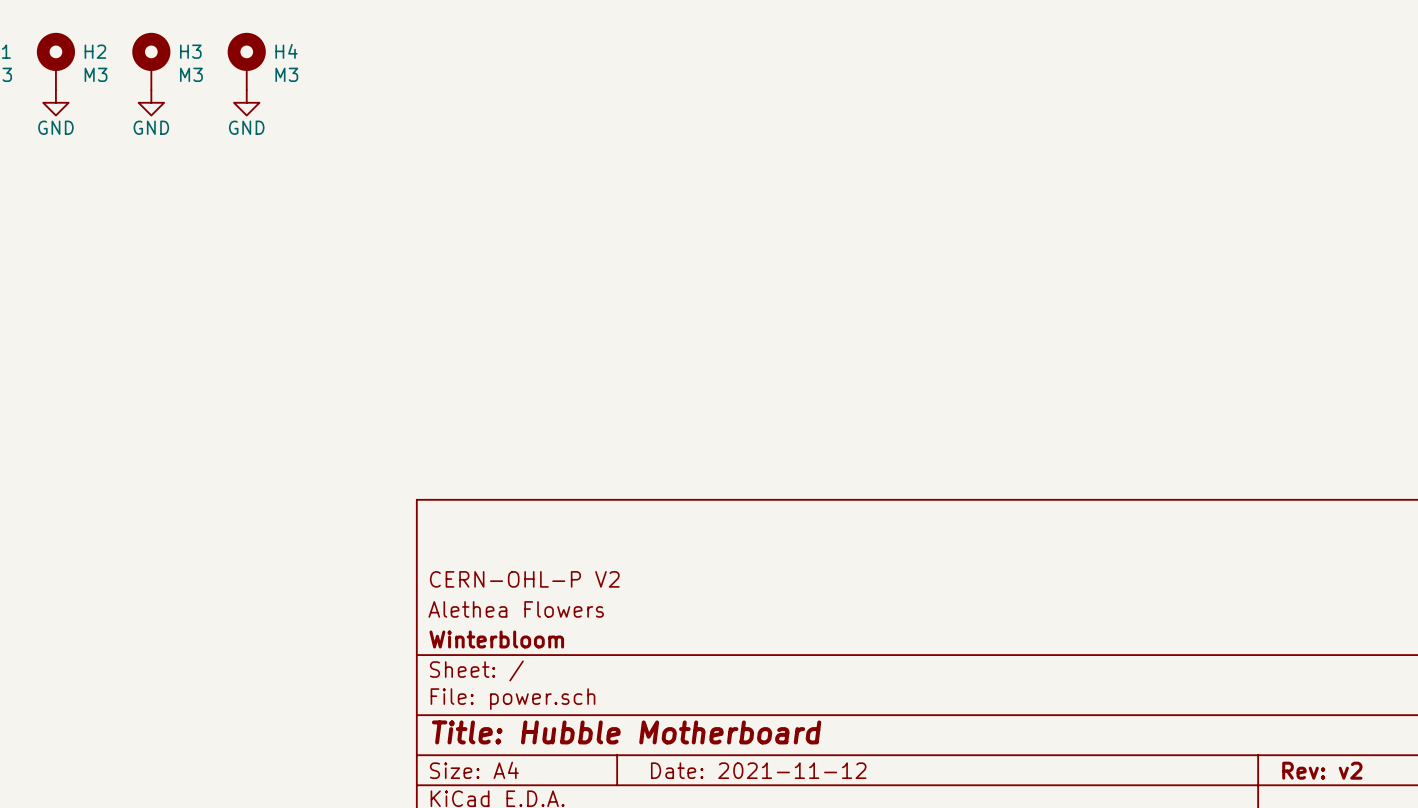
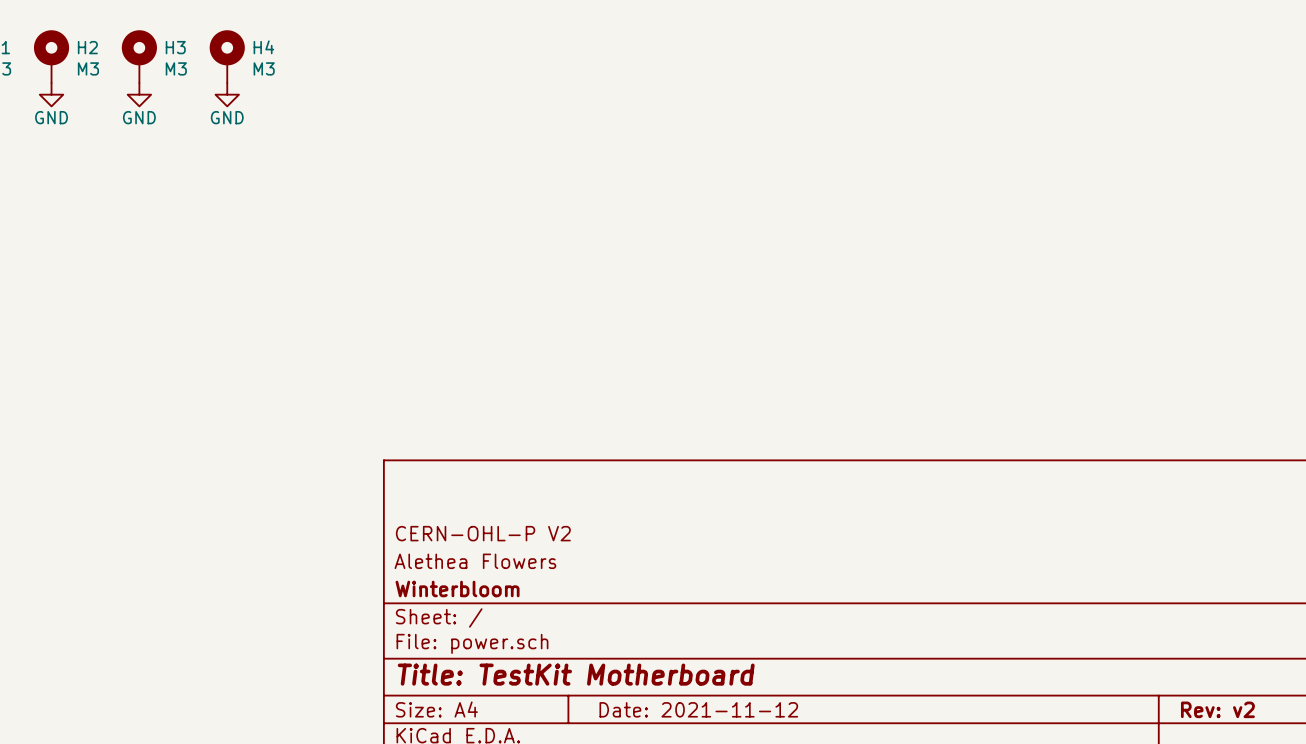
title block: Title: Hubble Motherboard (626, 732) -> Title: TestKit Motherboard (576, 674)

